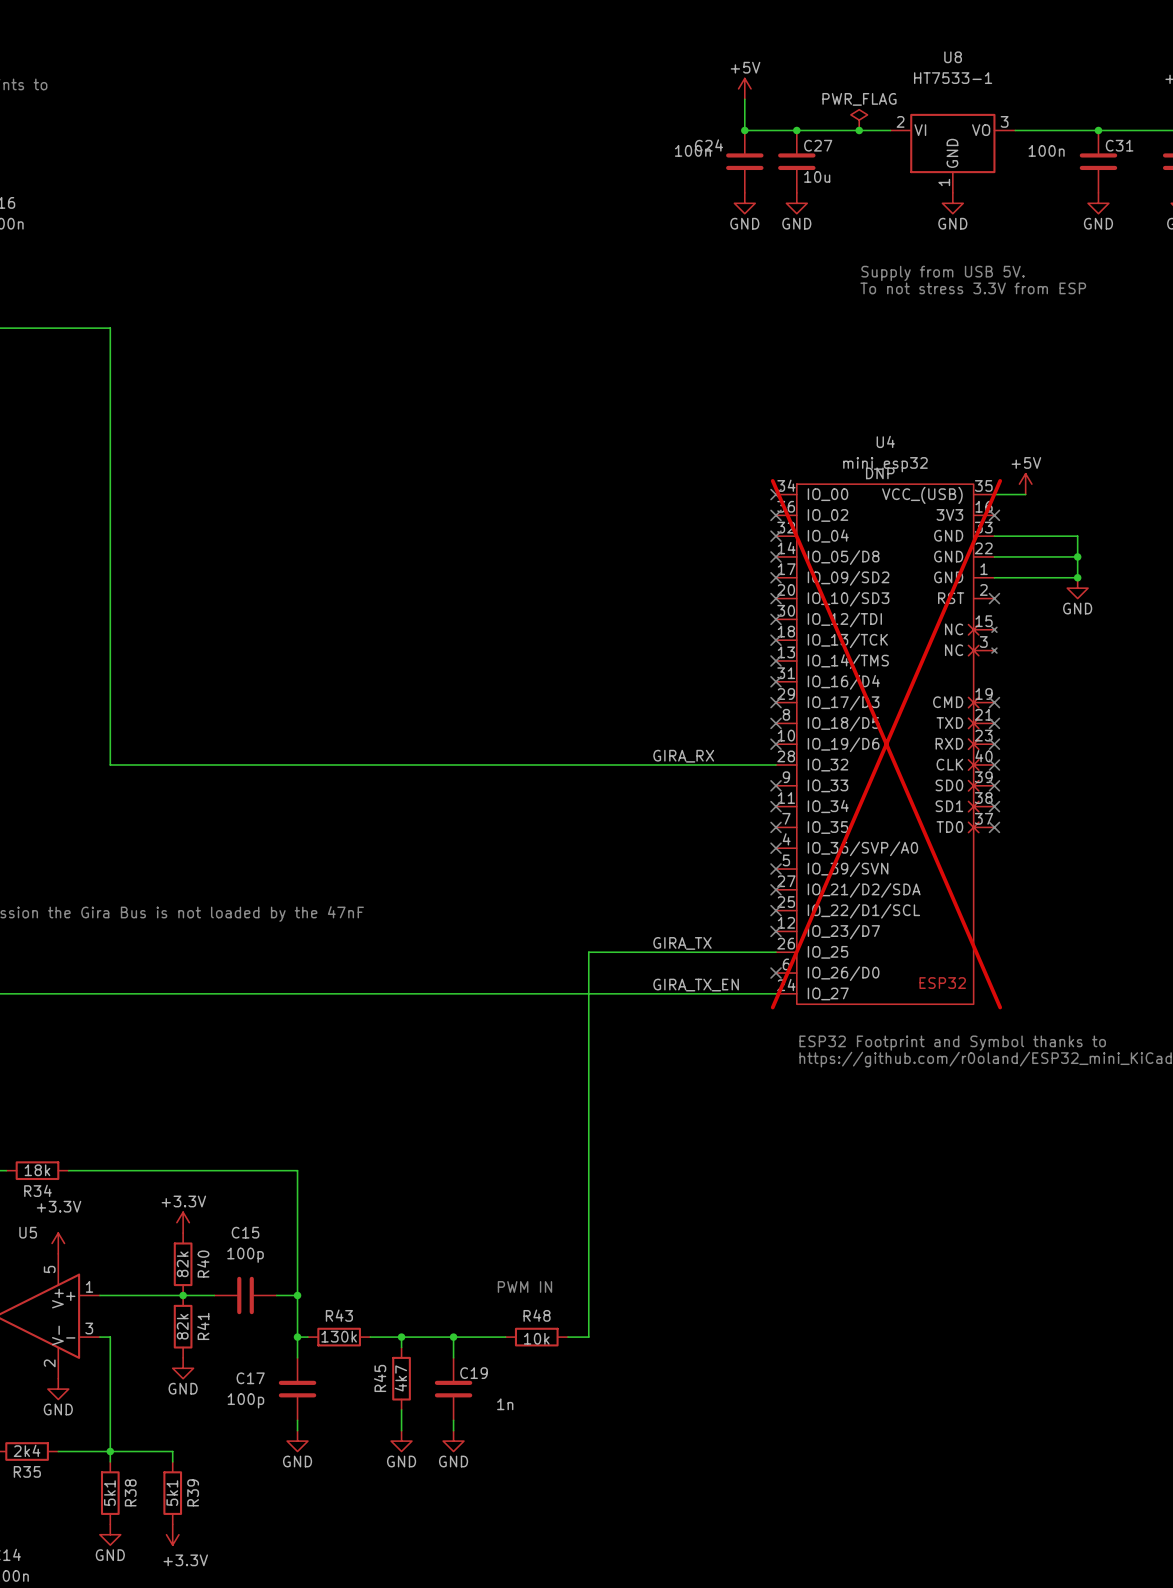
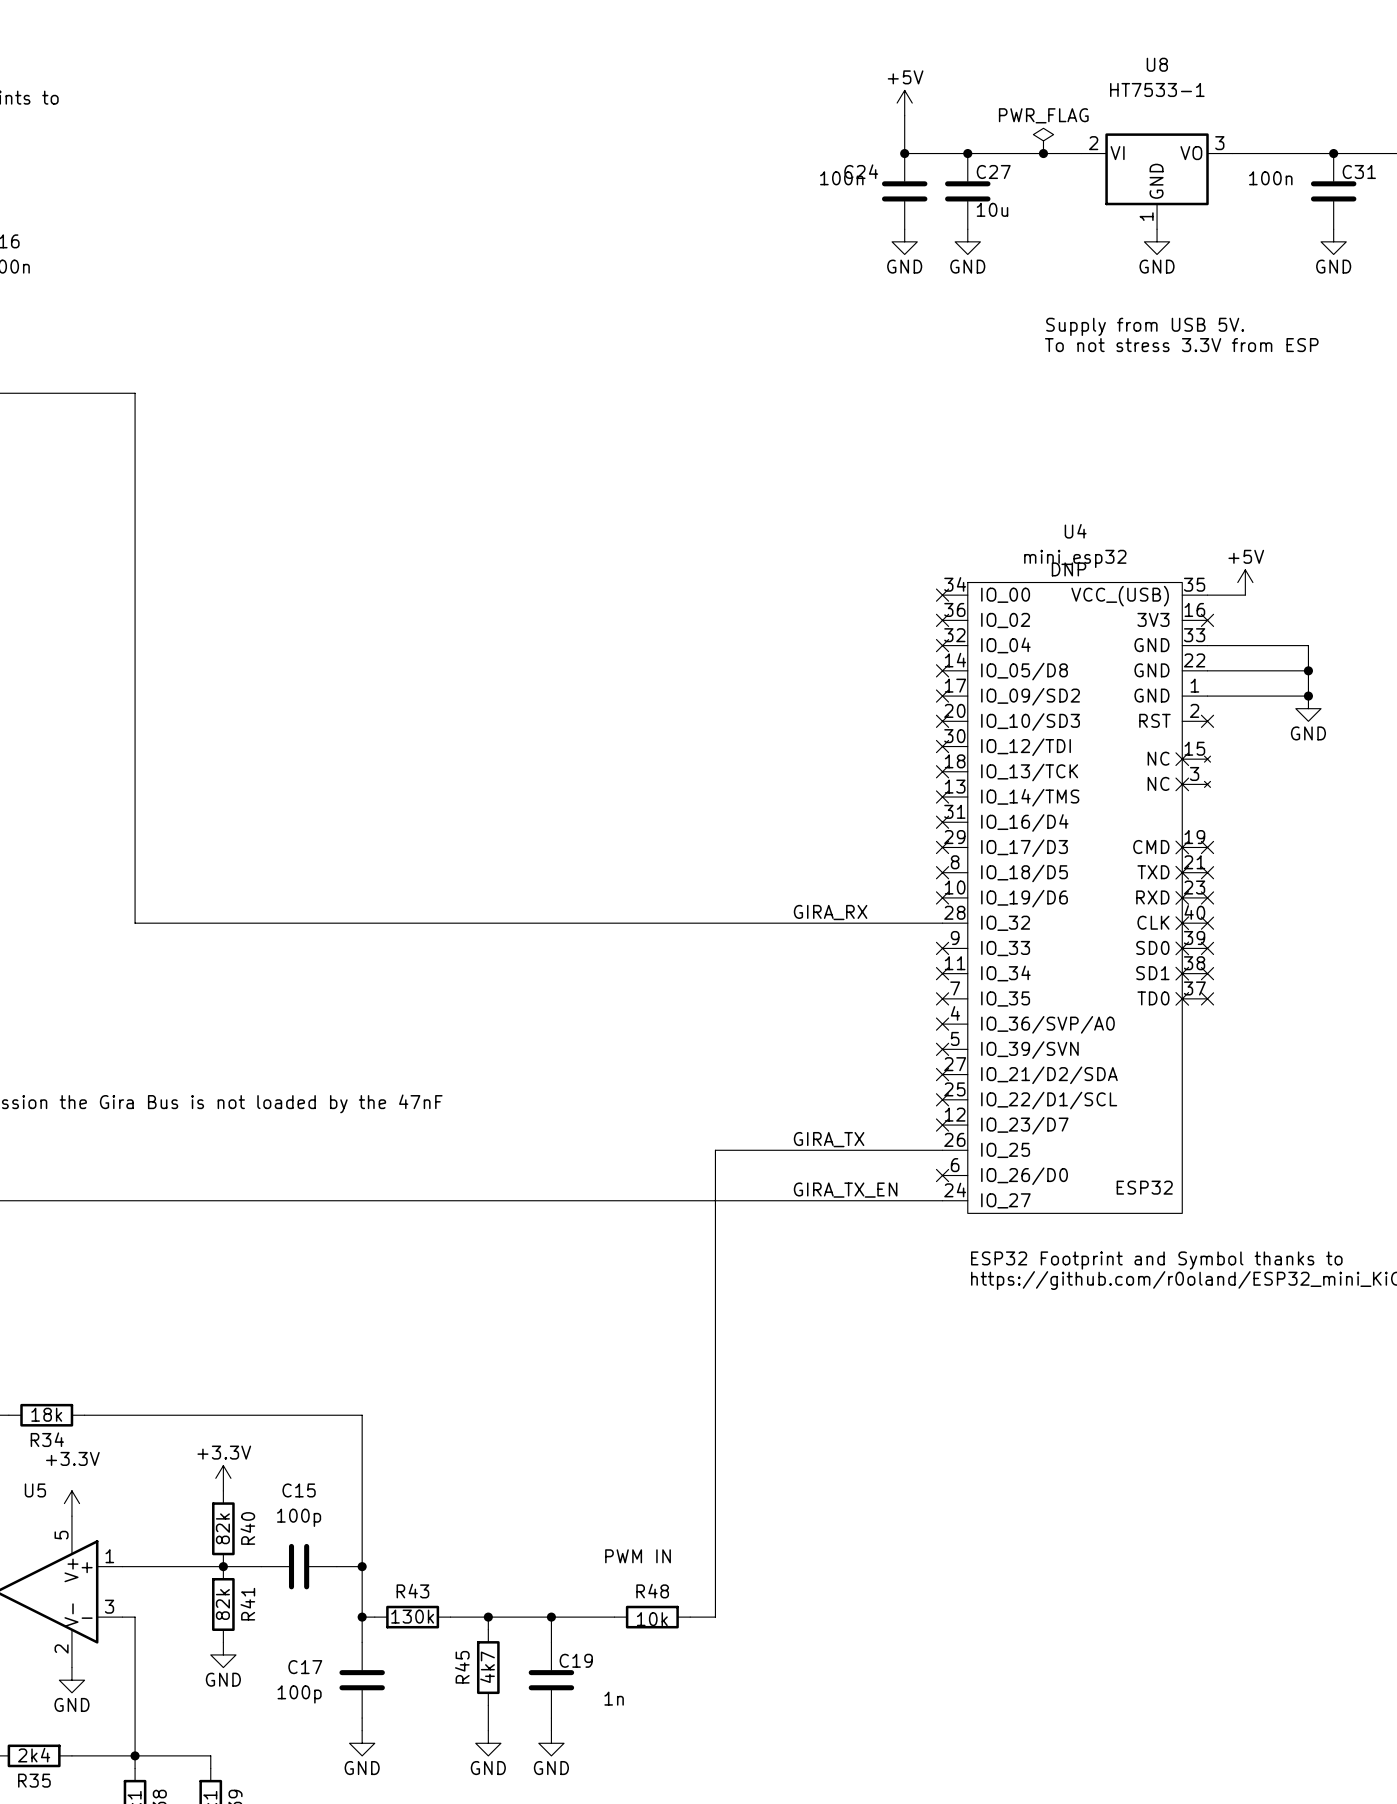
U4 do-not-place cross: (886, 744) -> none

